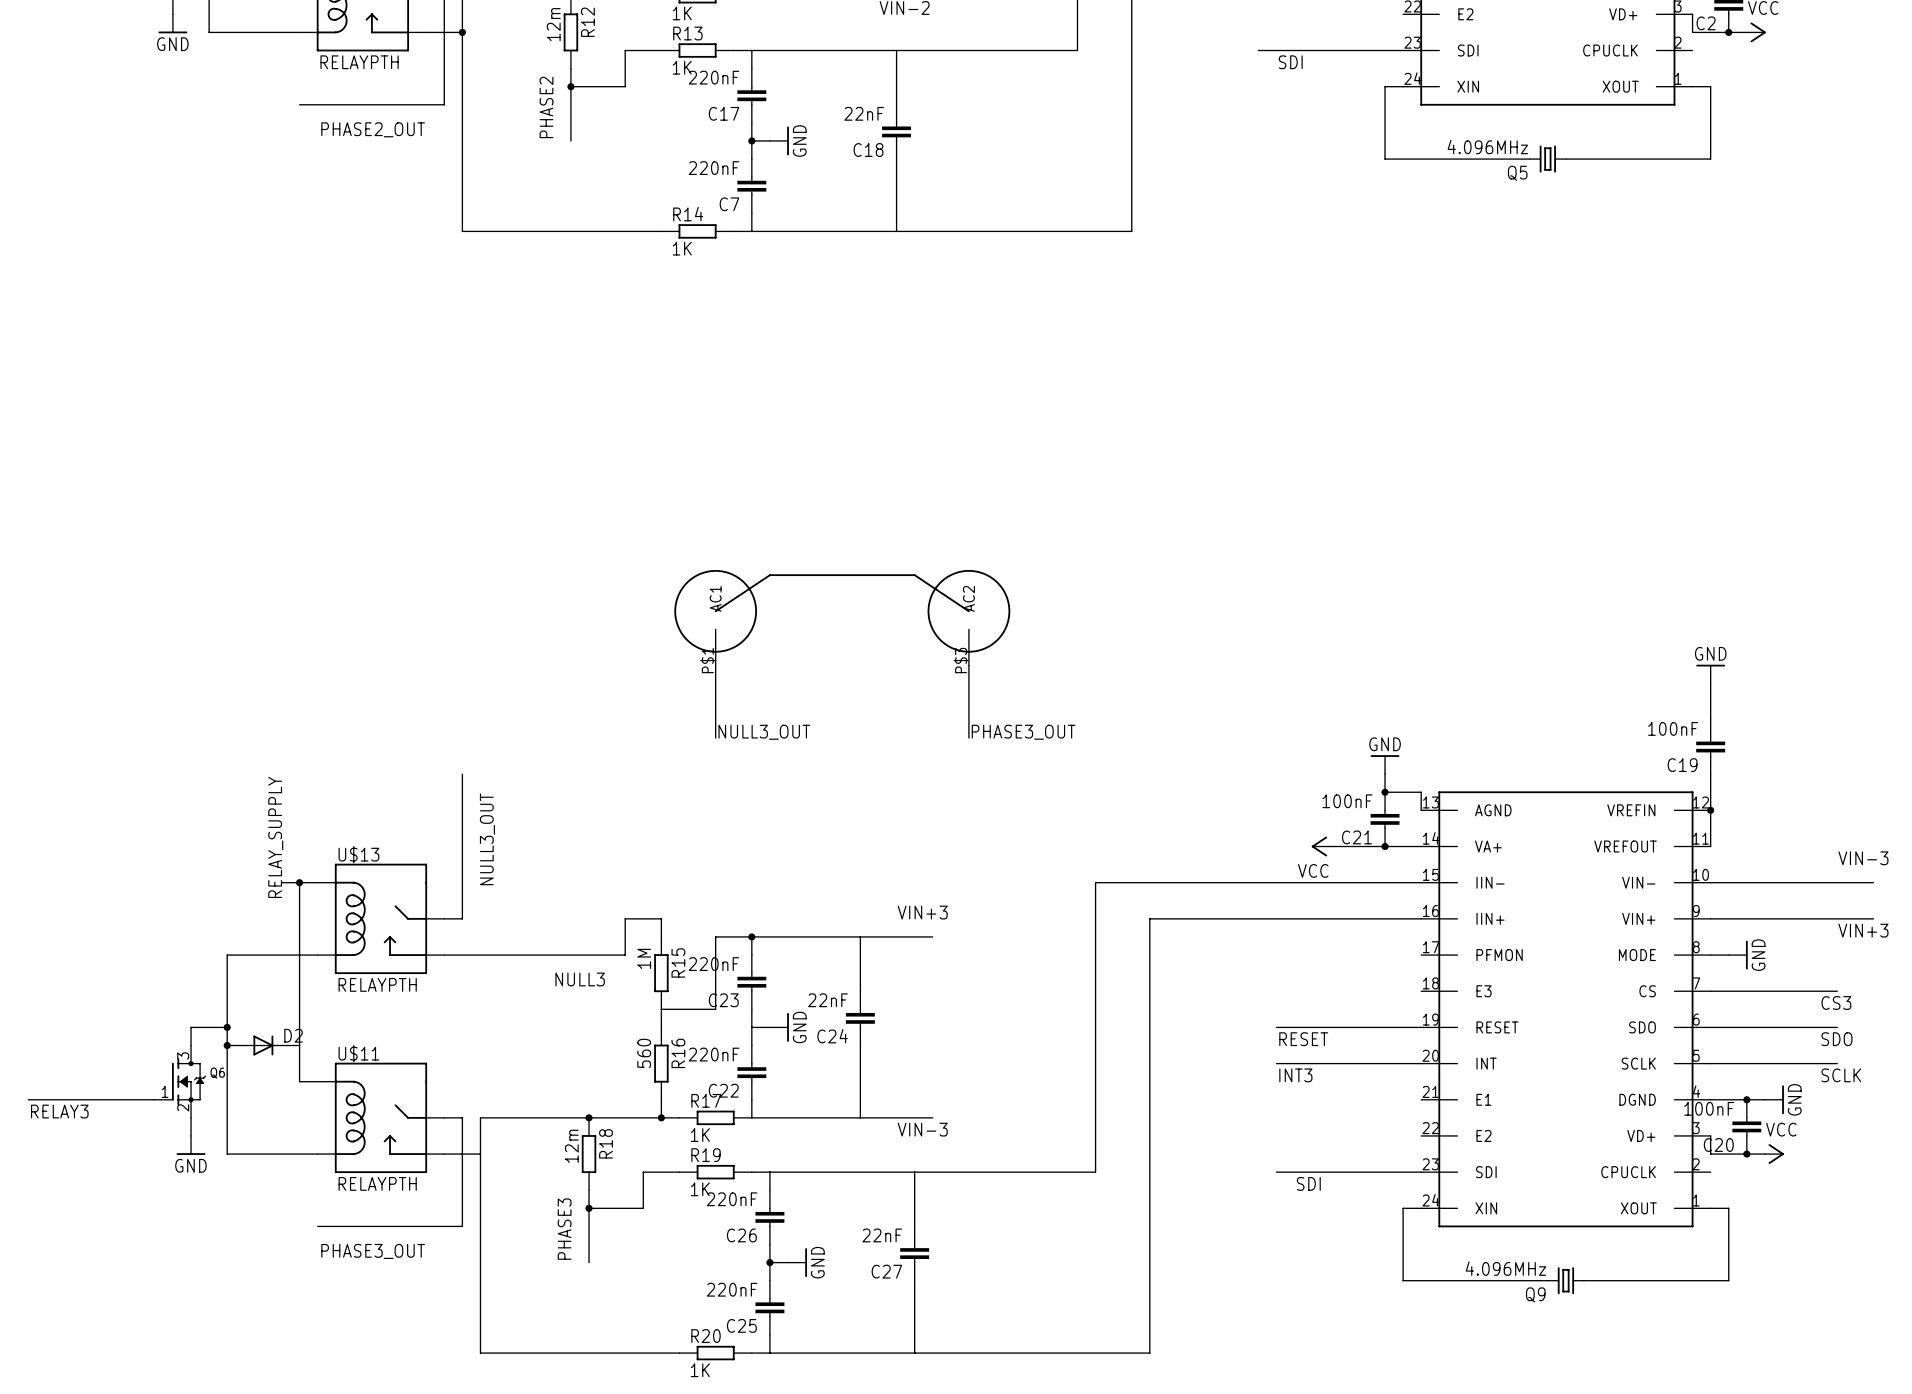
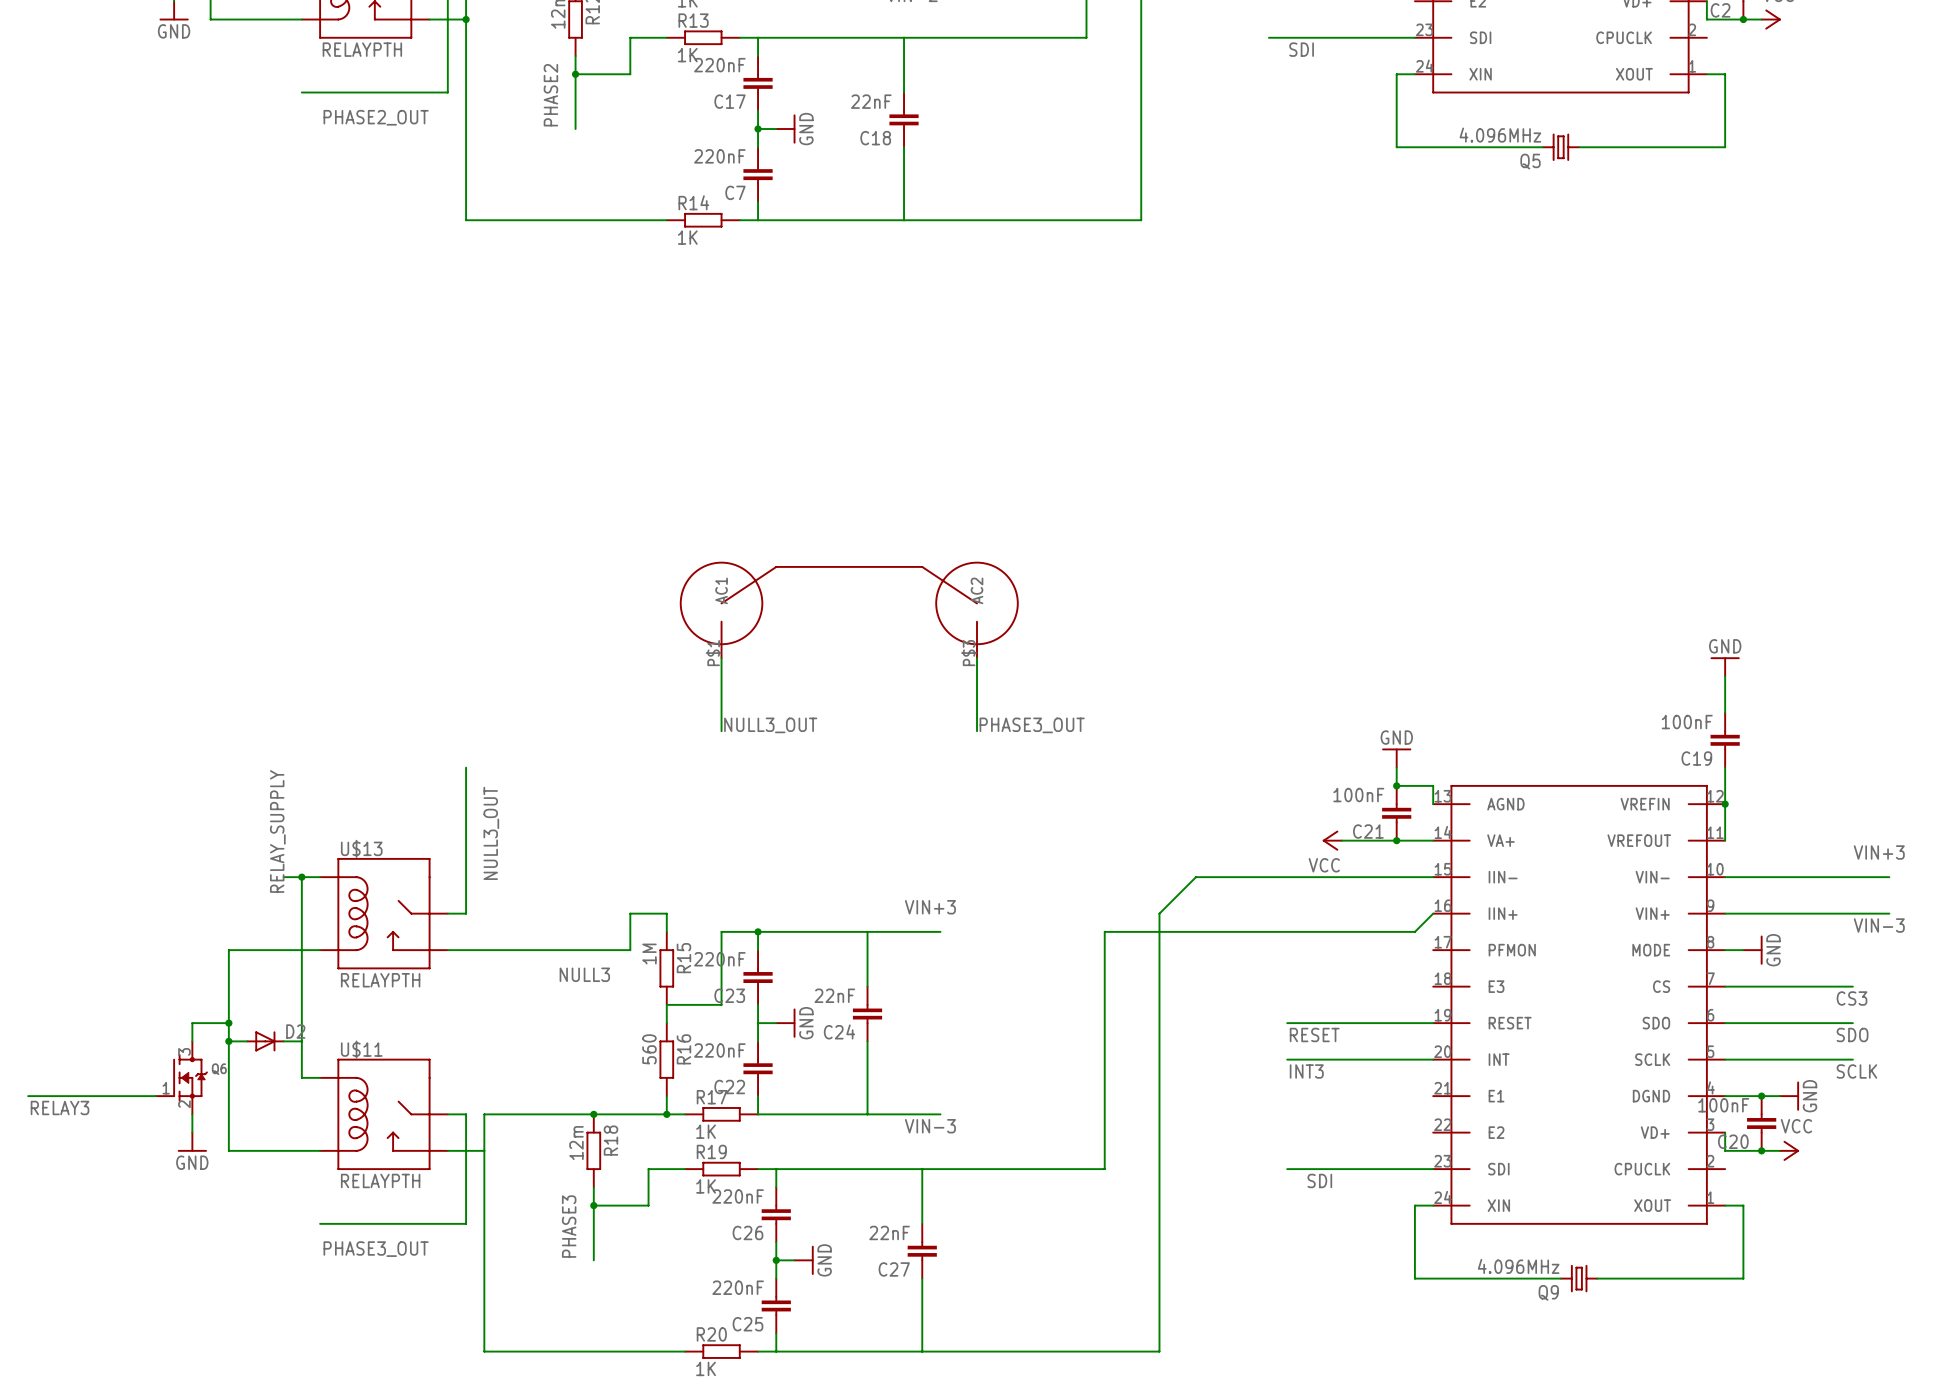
label: VIN-3 (1863, 858) -> VIN+3 (1879, 852)
wire: (1186, 882) (1095, 882) (1095, 936) -> (1195, 877) (1159, 913)
wire: (1149, 918) (1421, 918) -> (1104, 931) (1414, 931) (1433, 913)
label: VIN+3 (1863, 930) -> VIN-3 (1879, 925)

